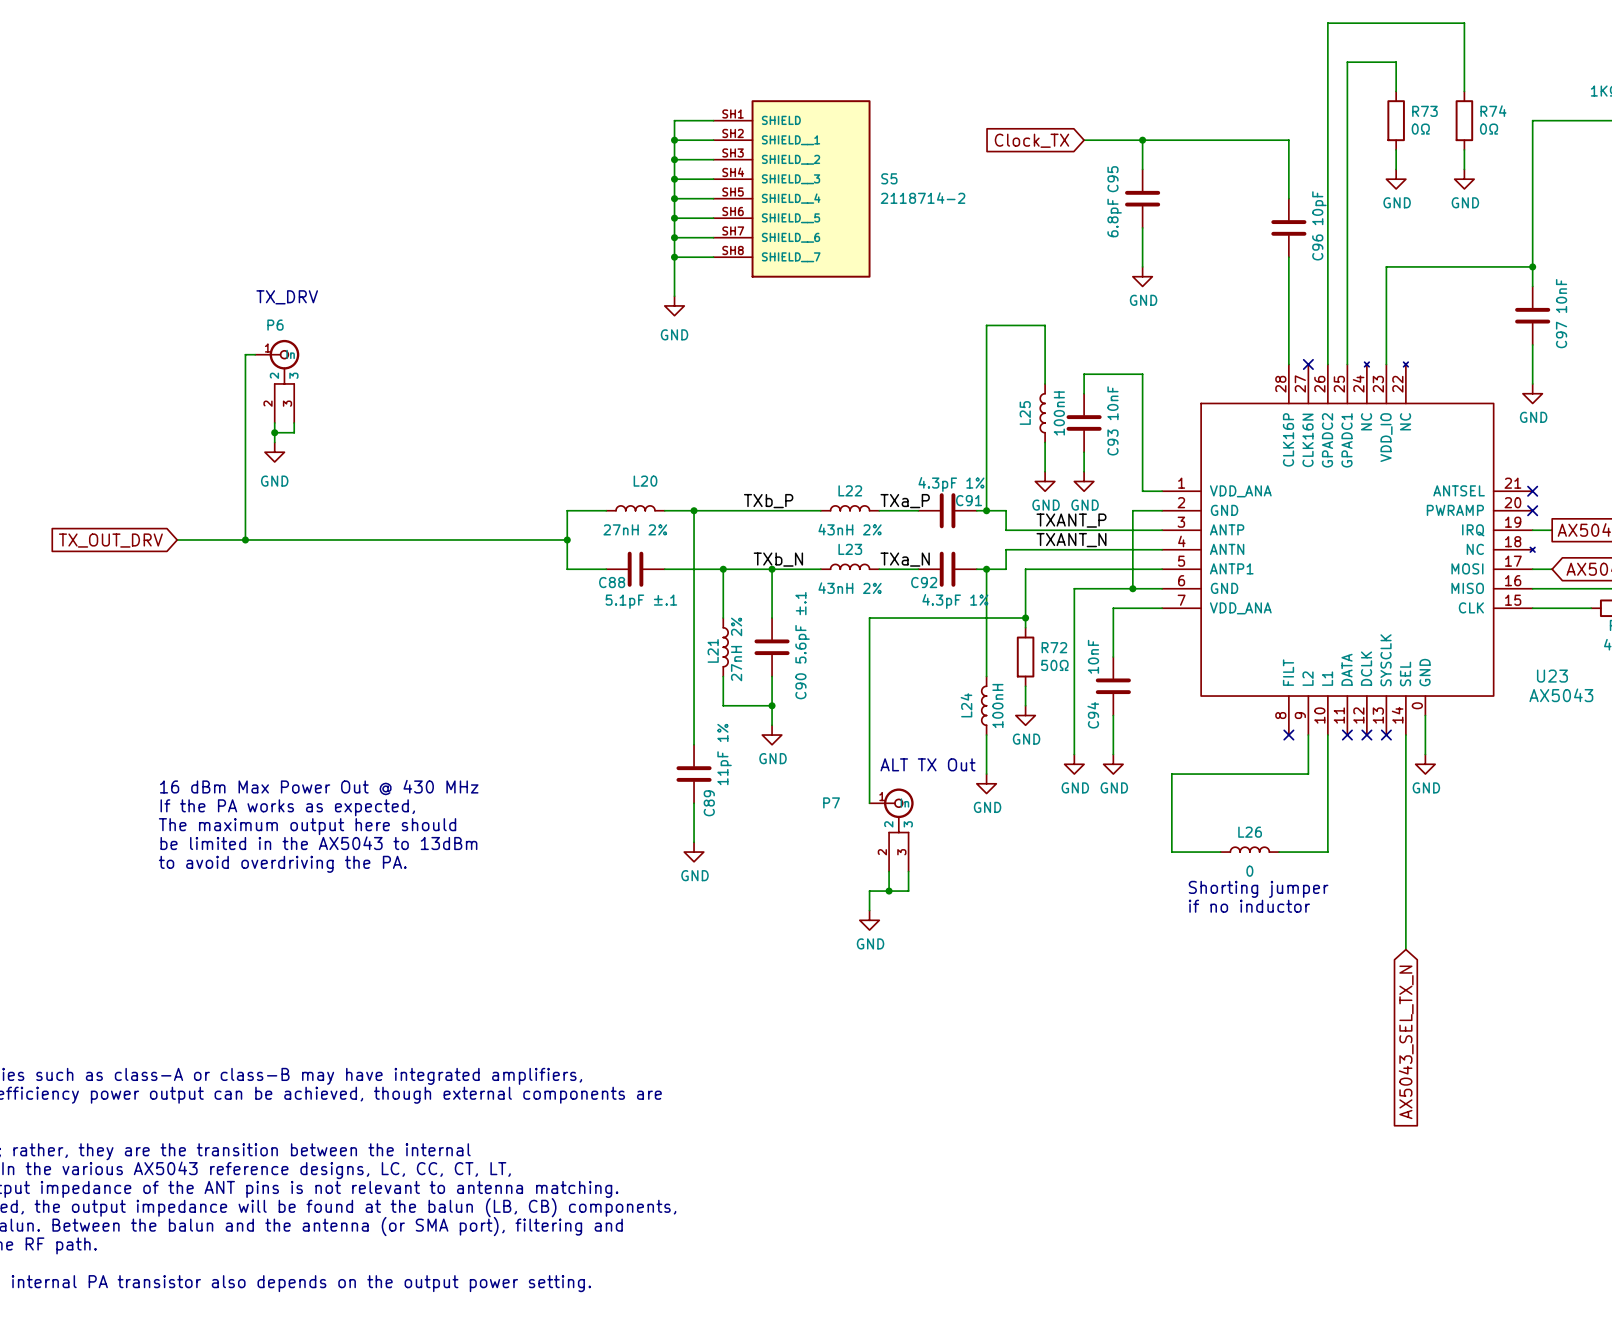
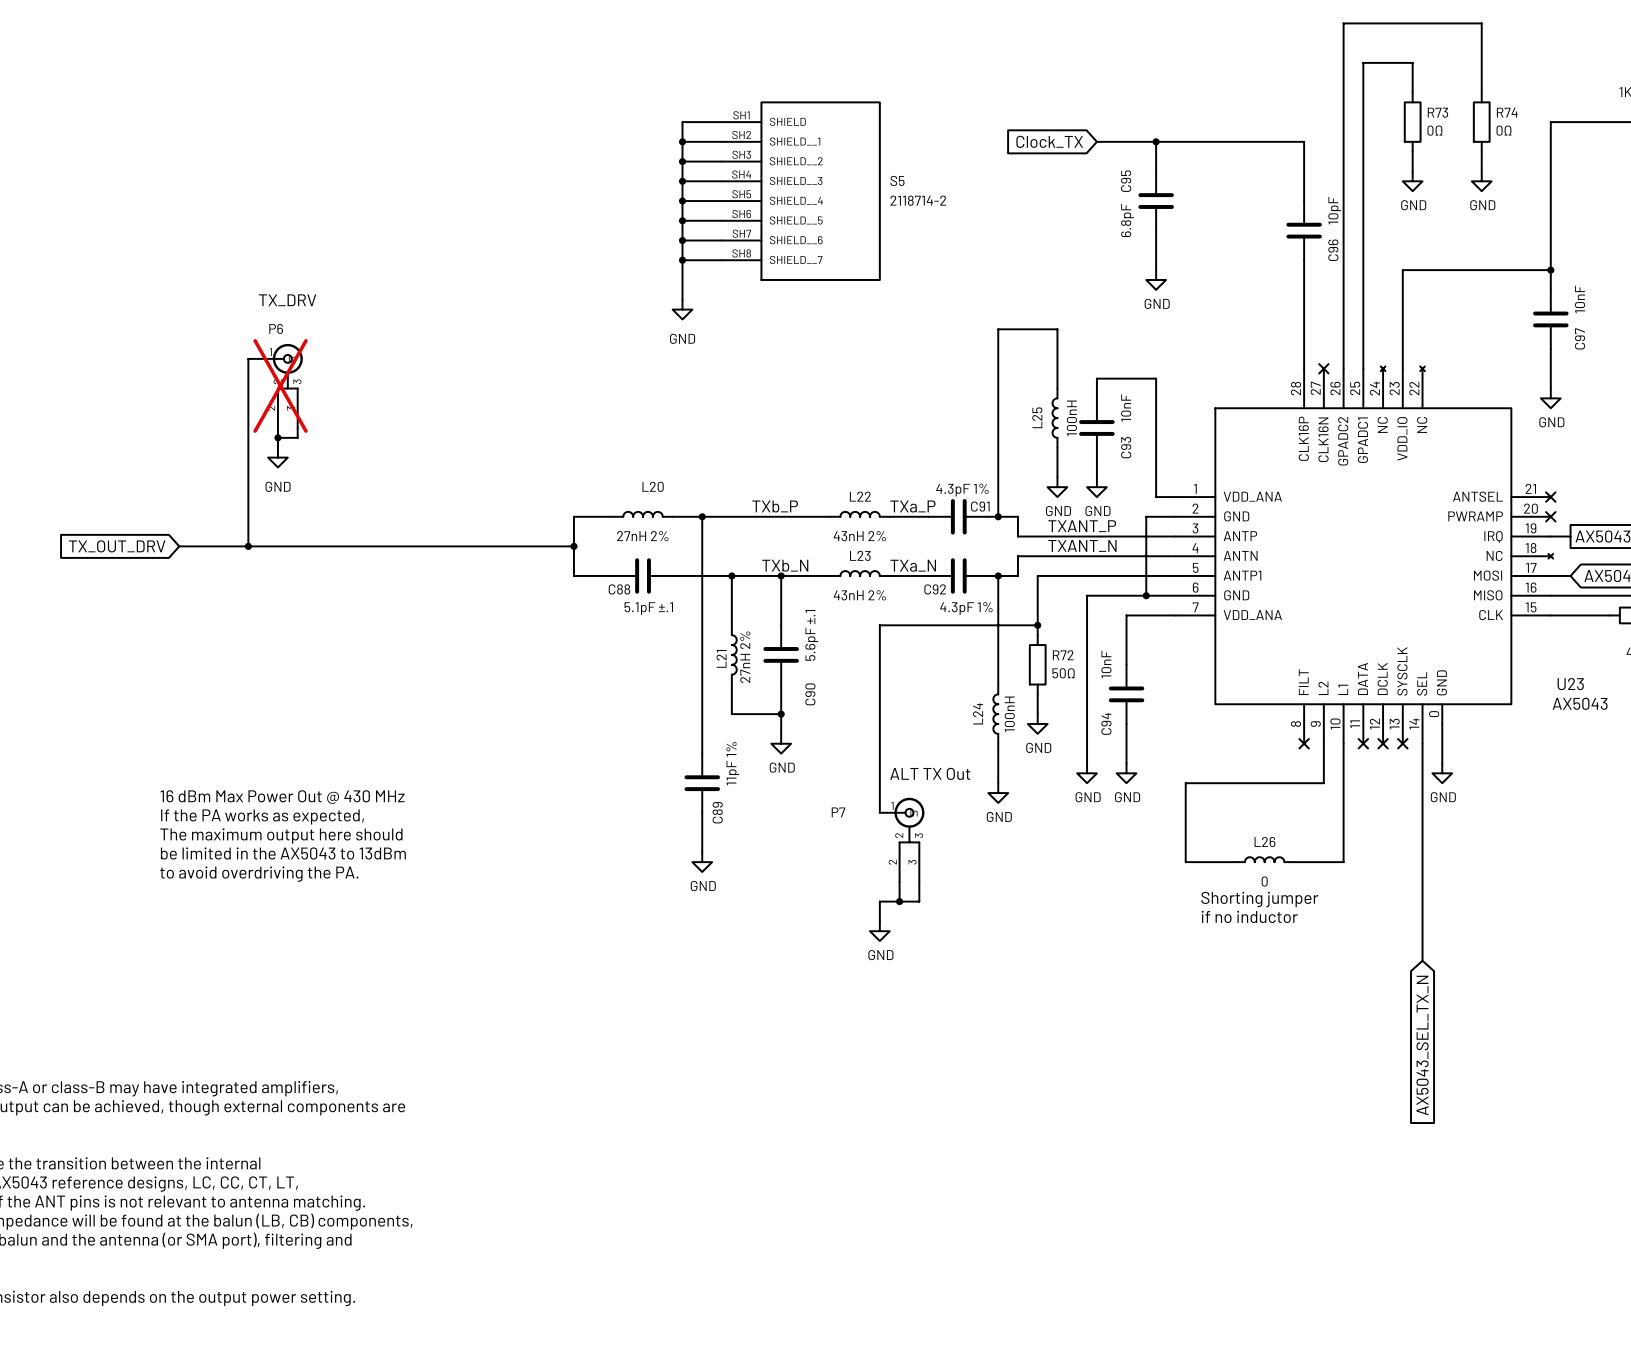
P6 do-not-place cross: none -> (280, 385)

